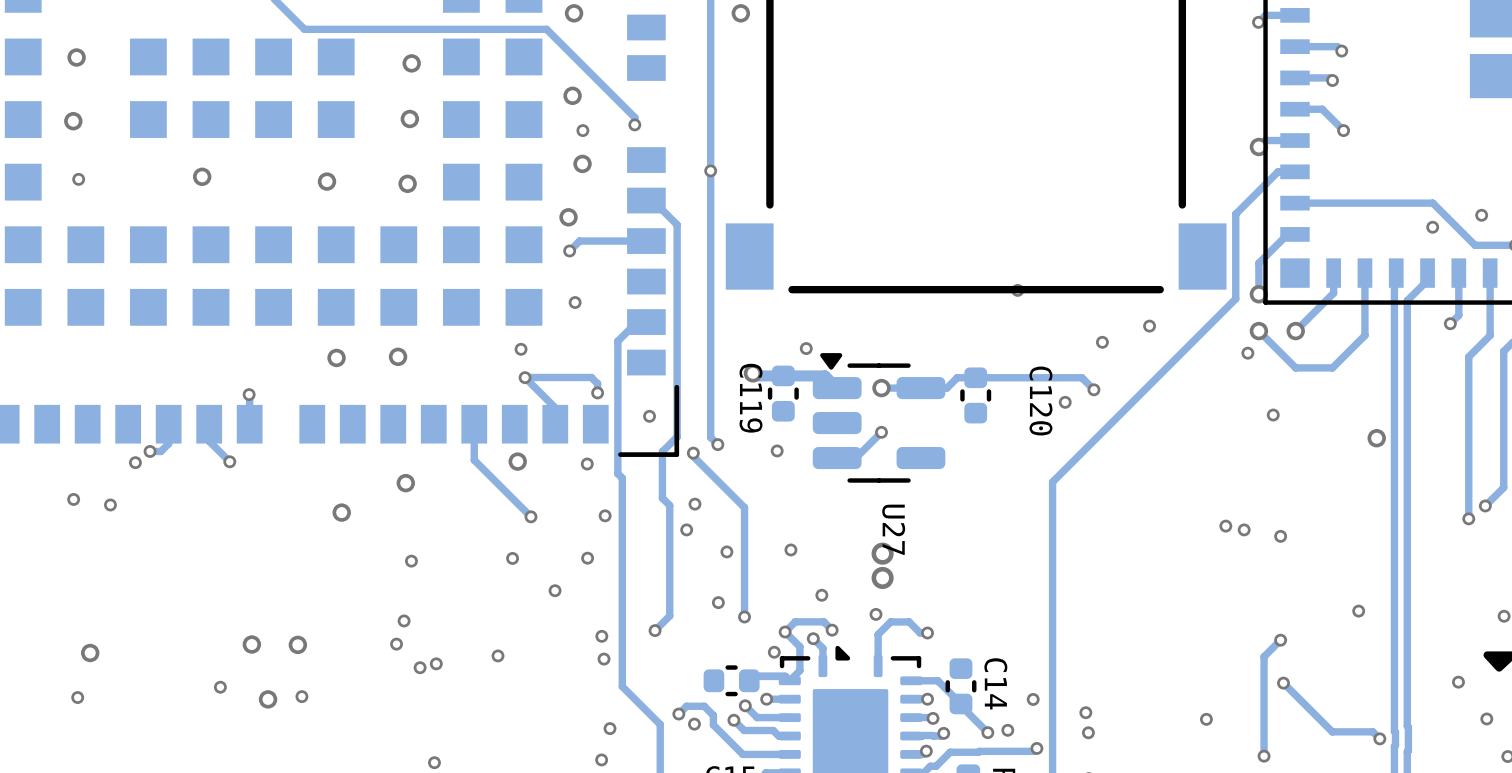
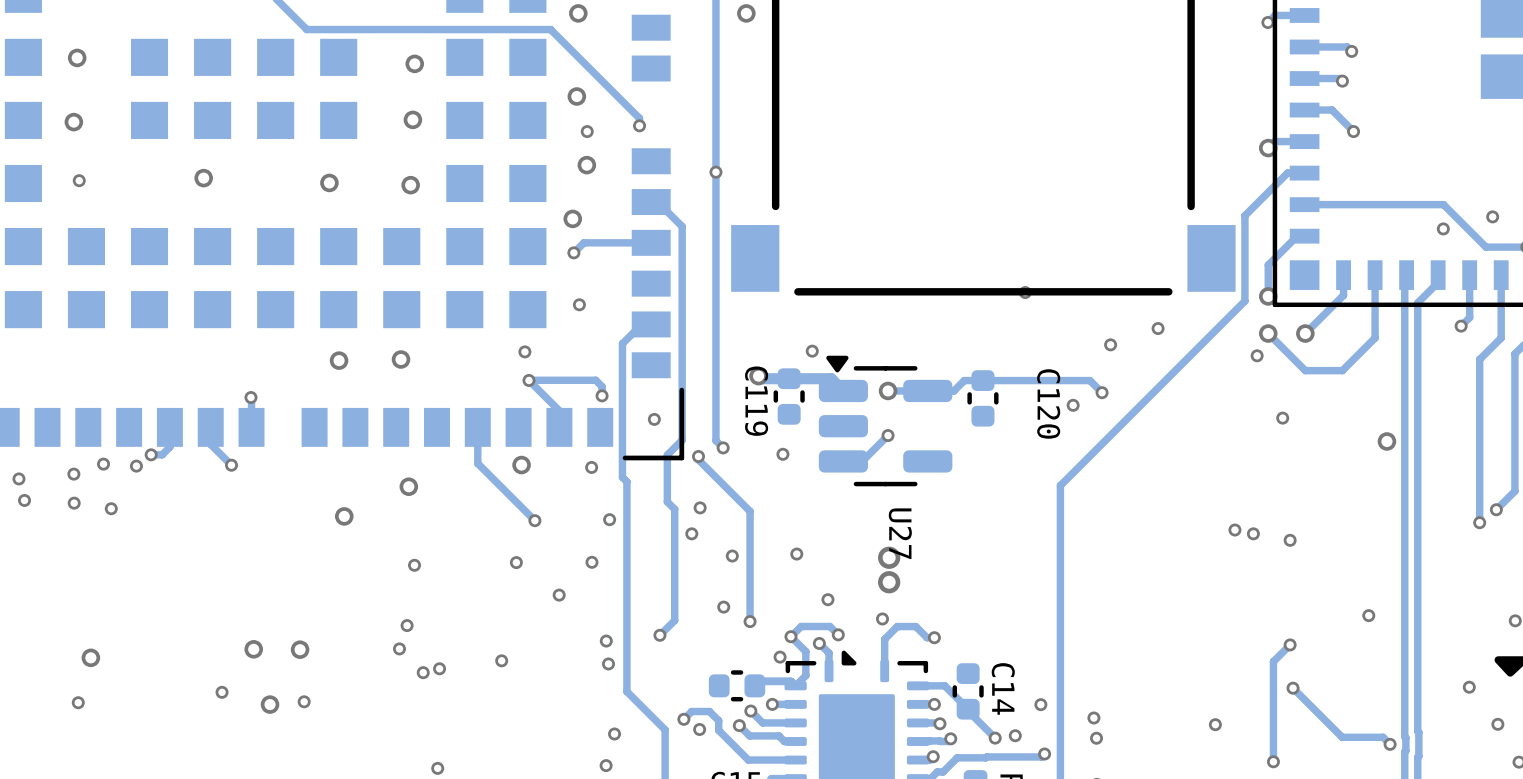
via: none -> (103, 464)
via: none -> (73, 474)
via: none -> (18, 478)
via: none -> (24, 500)

